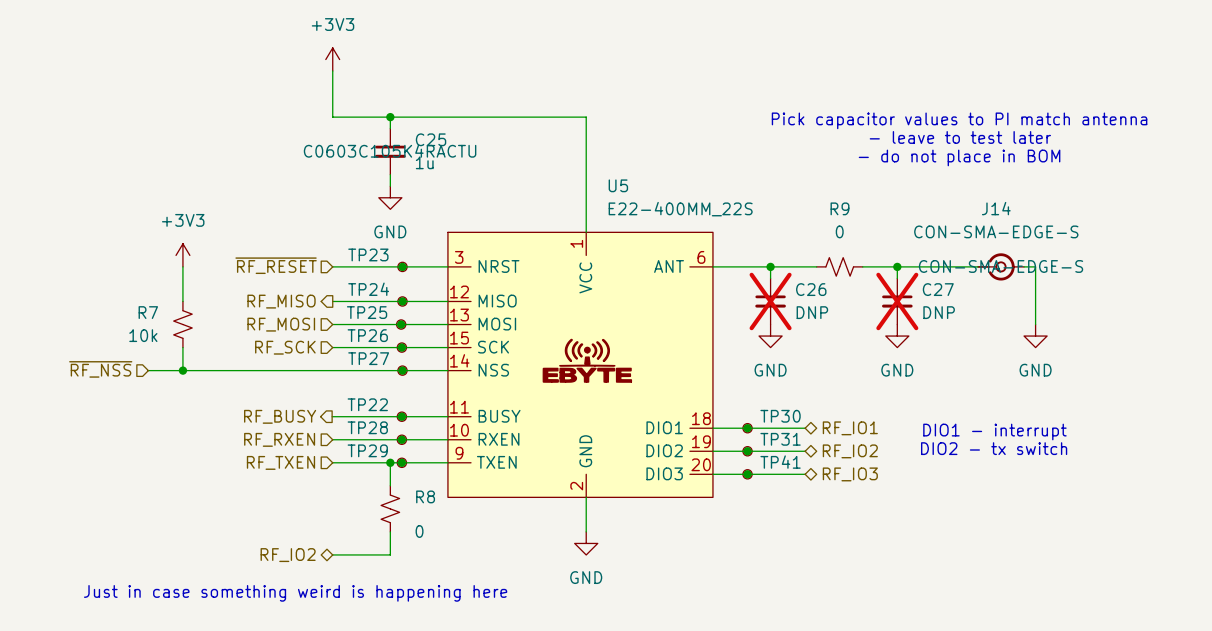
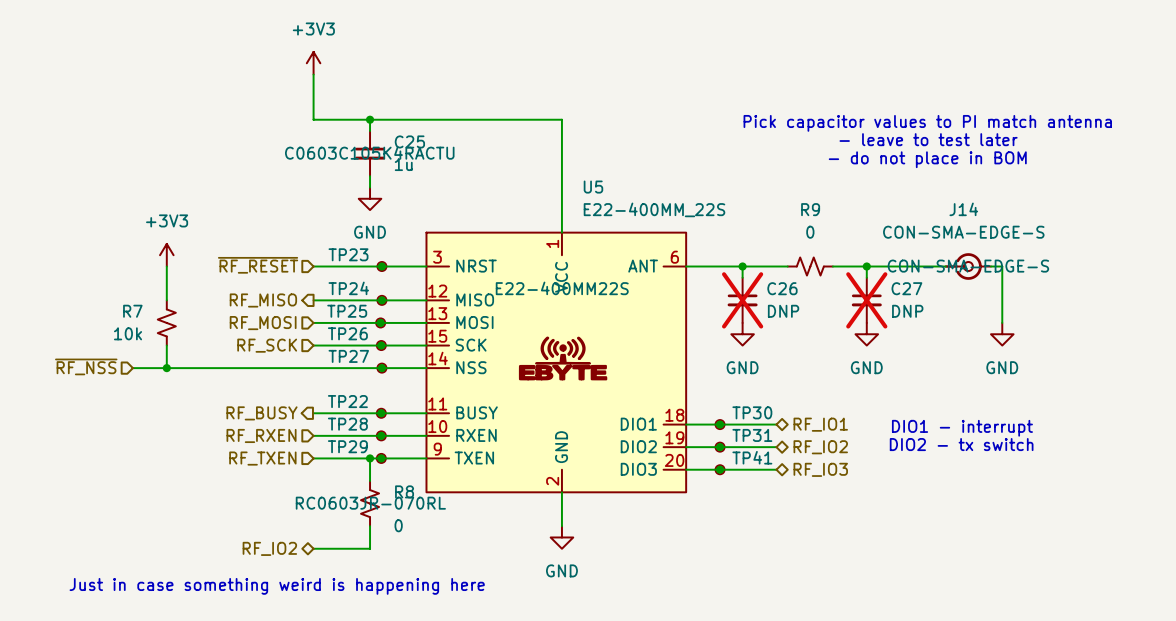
U5 text: none -> E22-400MM22S (562, 288)
R8 text: none -> RC0603JR-070RL (370, 503)

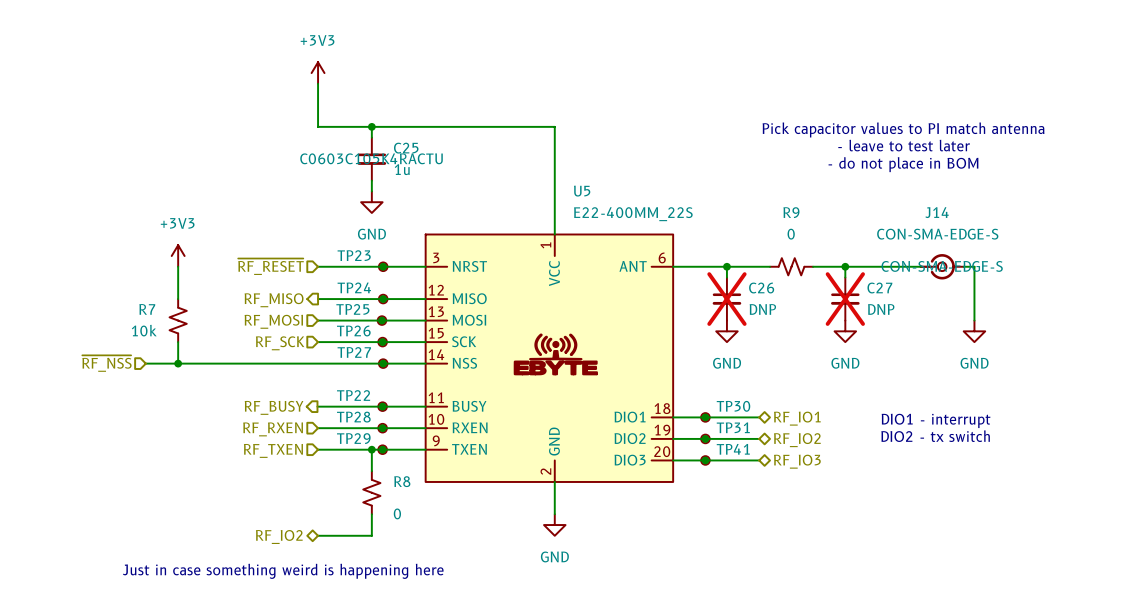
U5 text: E22-400MM22S (562, 288) -> none
R8 text: RC0603JR-070RL (370, 503) -> none

